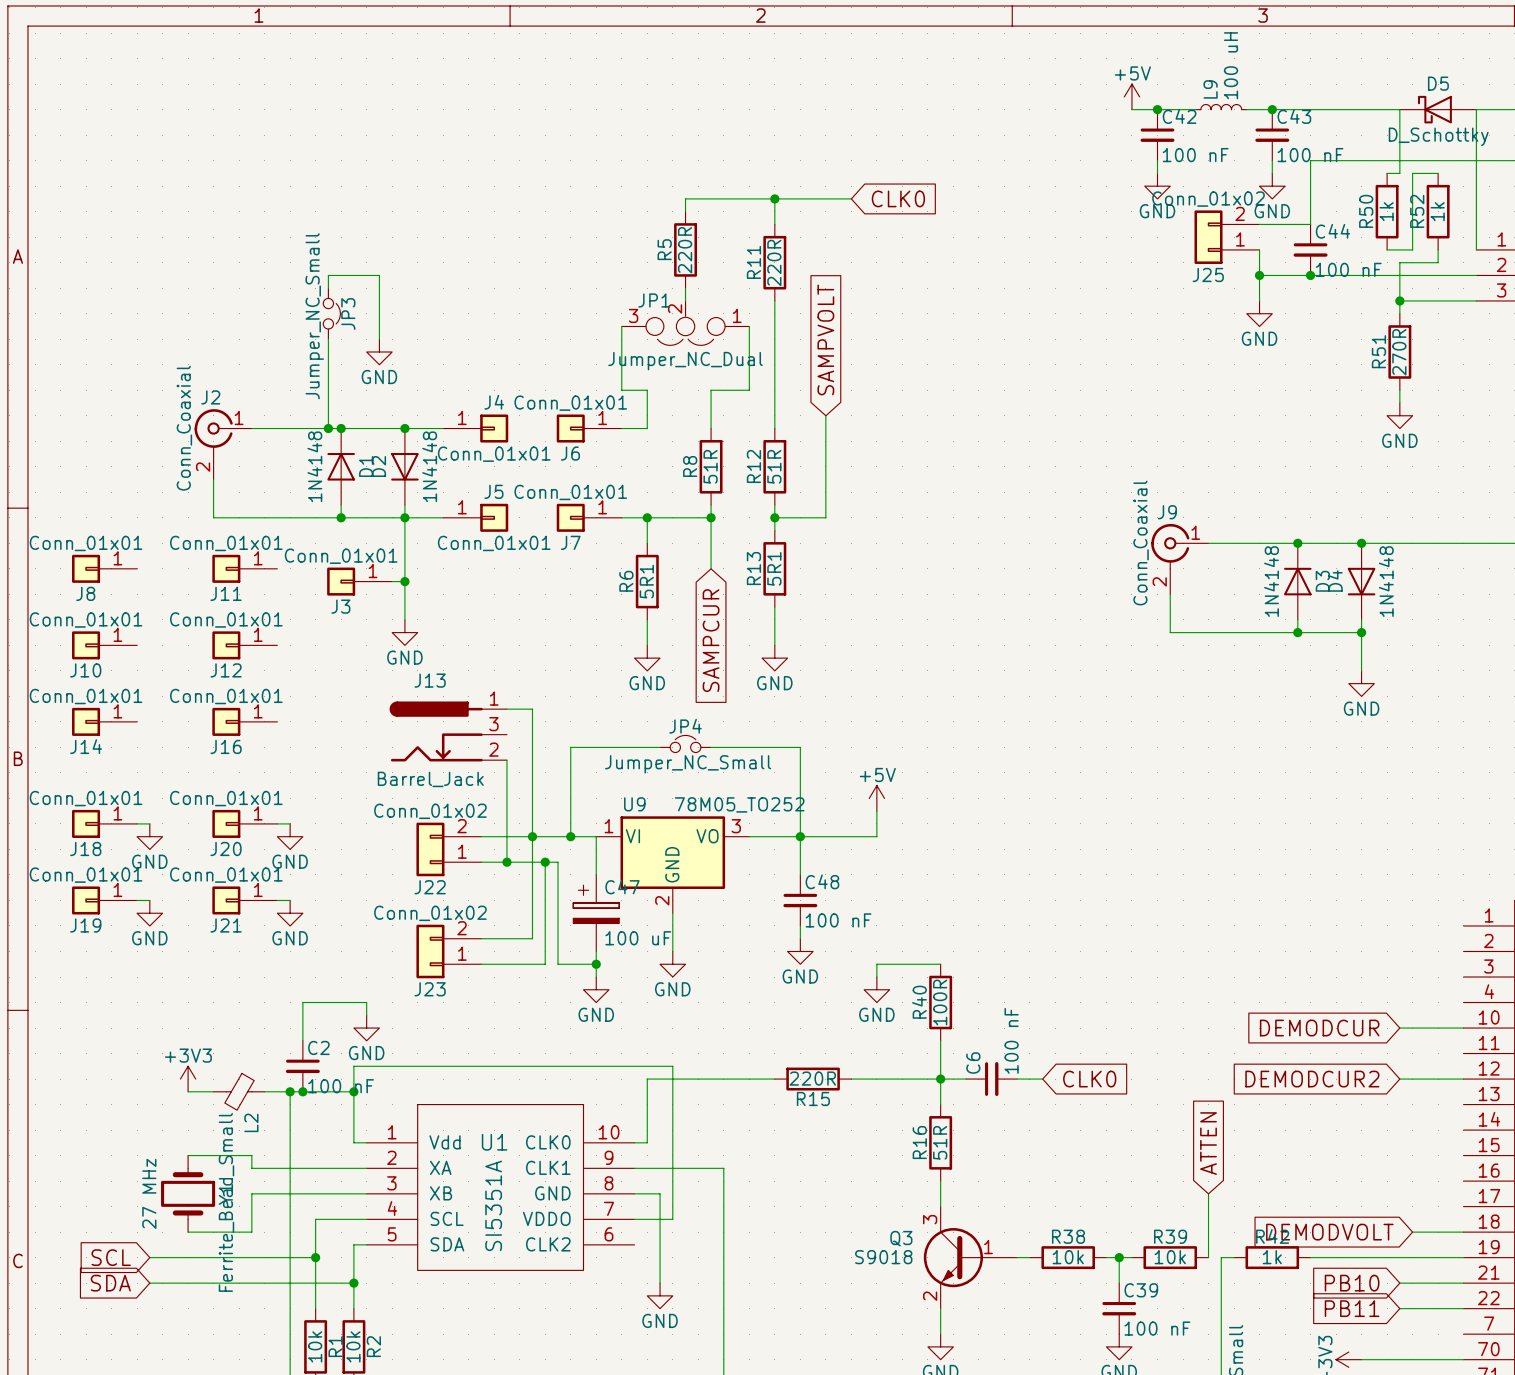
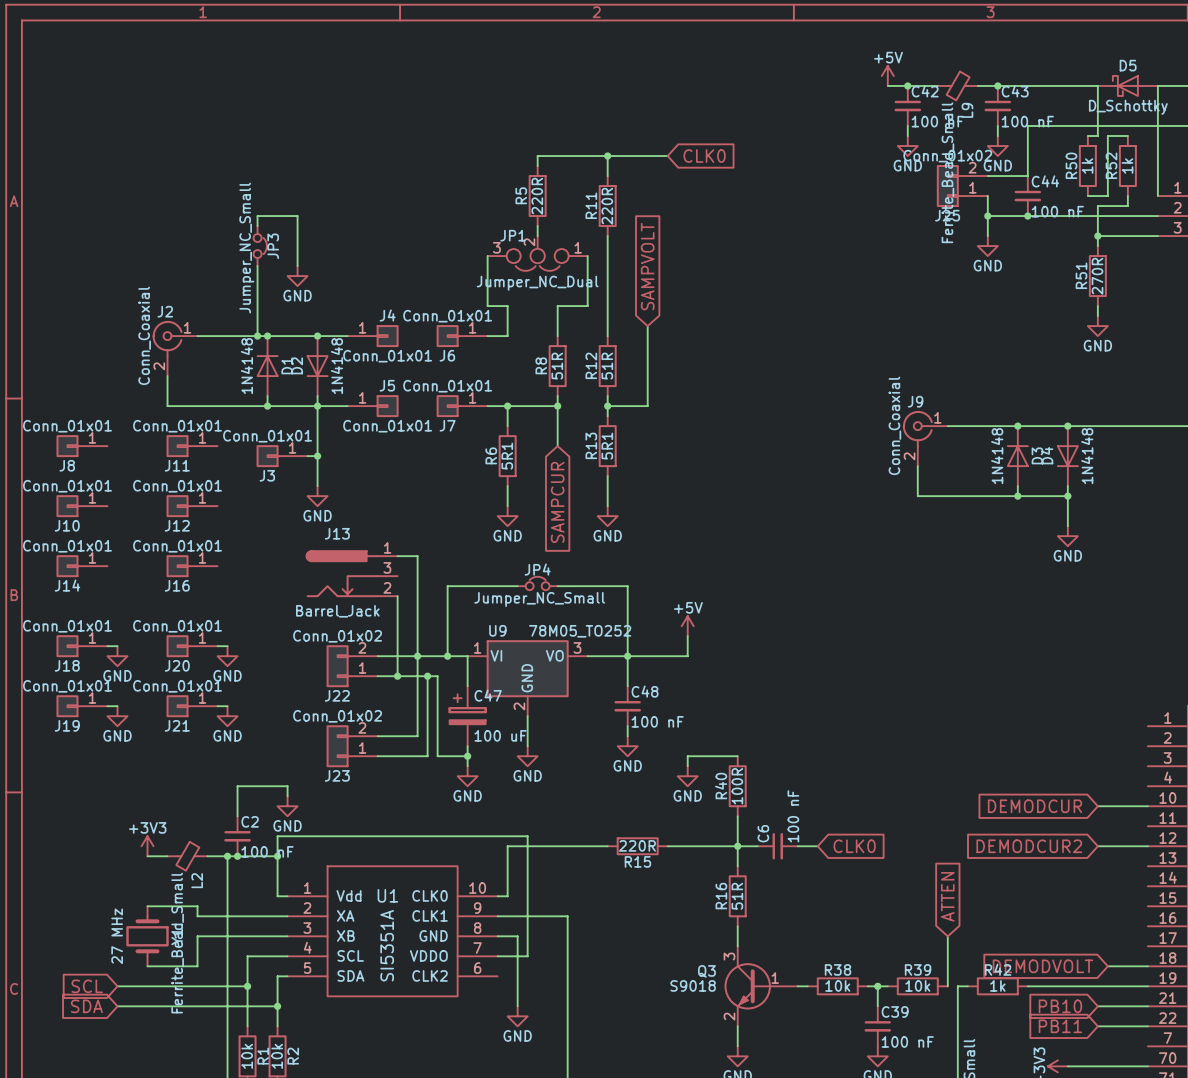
L9 value: 100 uH (1231, 65) -> Ferrite_Bead_Small (947, 172)
L9 name position: L9 (1210, 89) -> L9 (967, 110)
L9 symbol: [1195, 104, 1247, 110] -> [937, 71, 978, 101]

